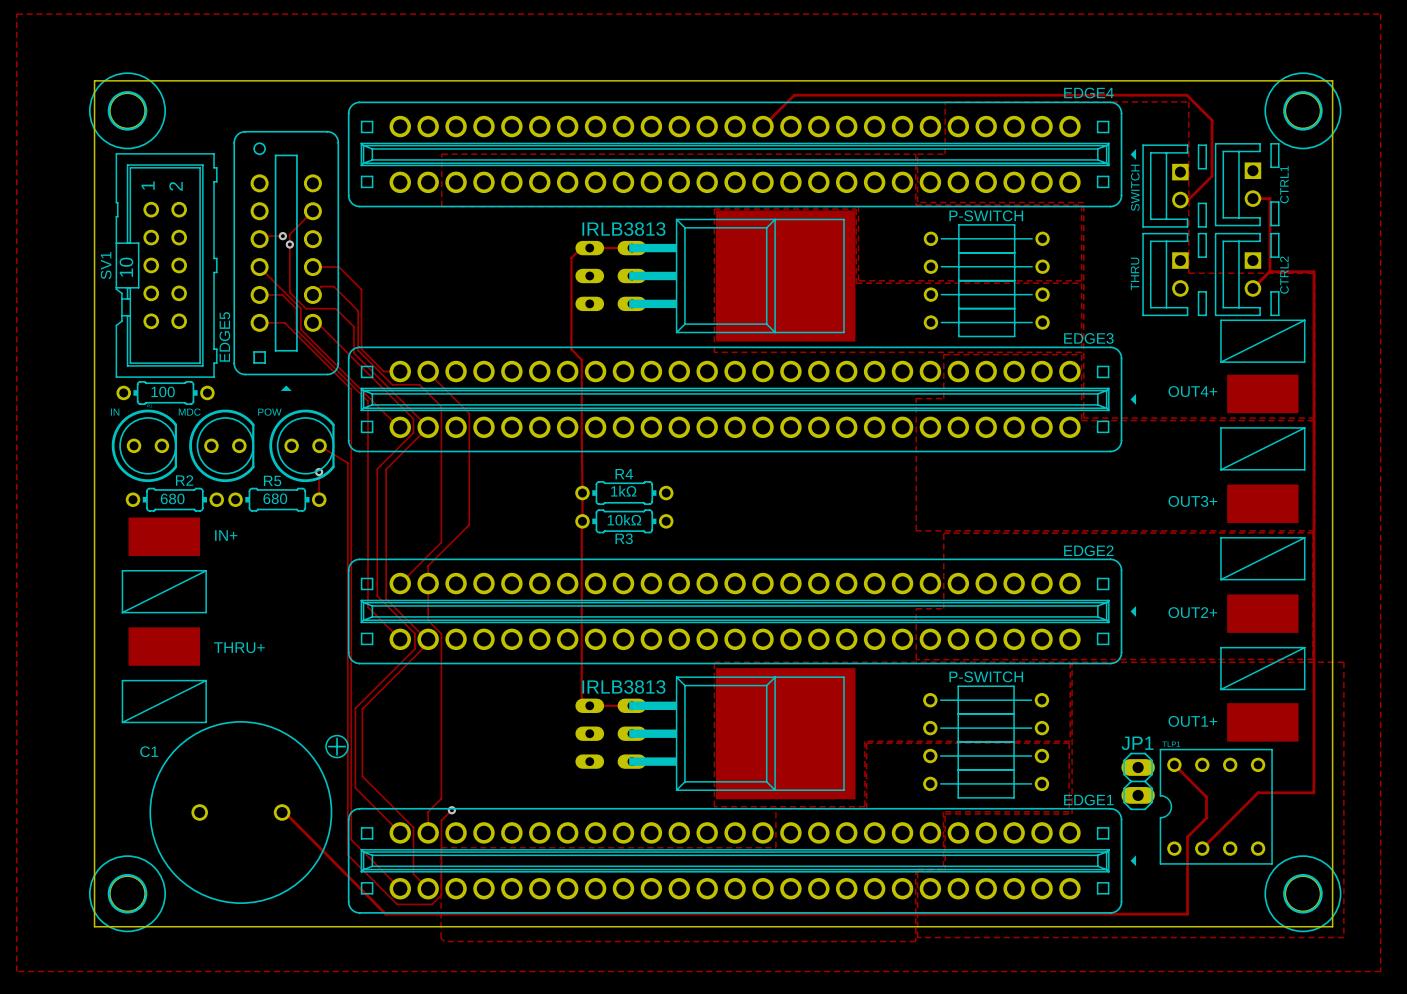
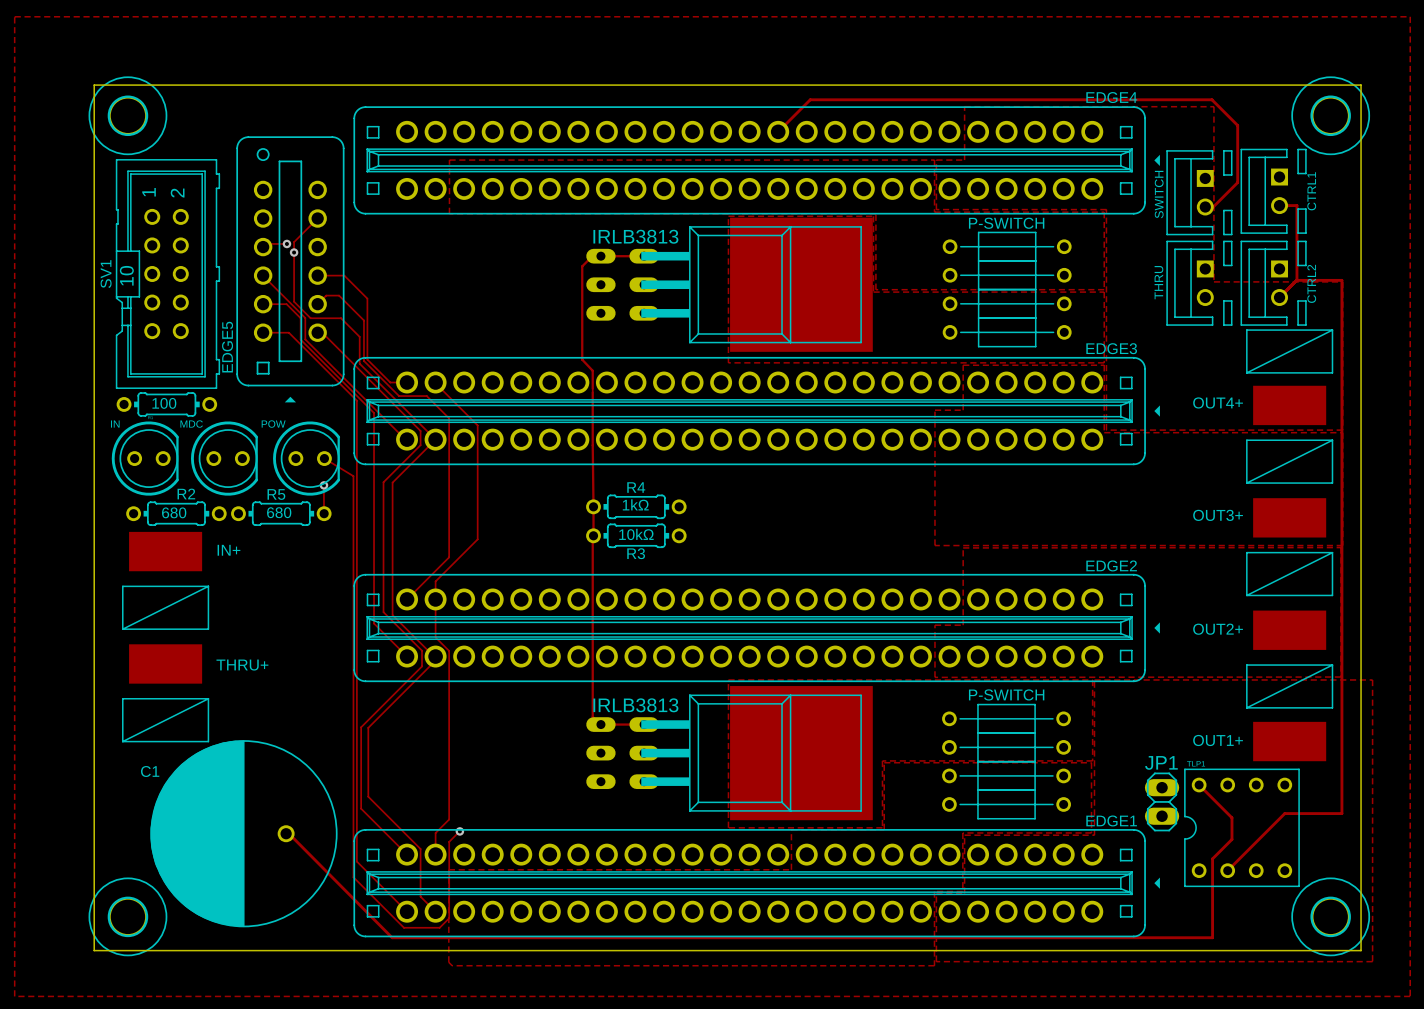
C1 footprint: [149, 721, 349, 904] -> [150, 740, 338, 928]

